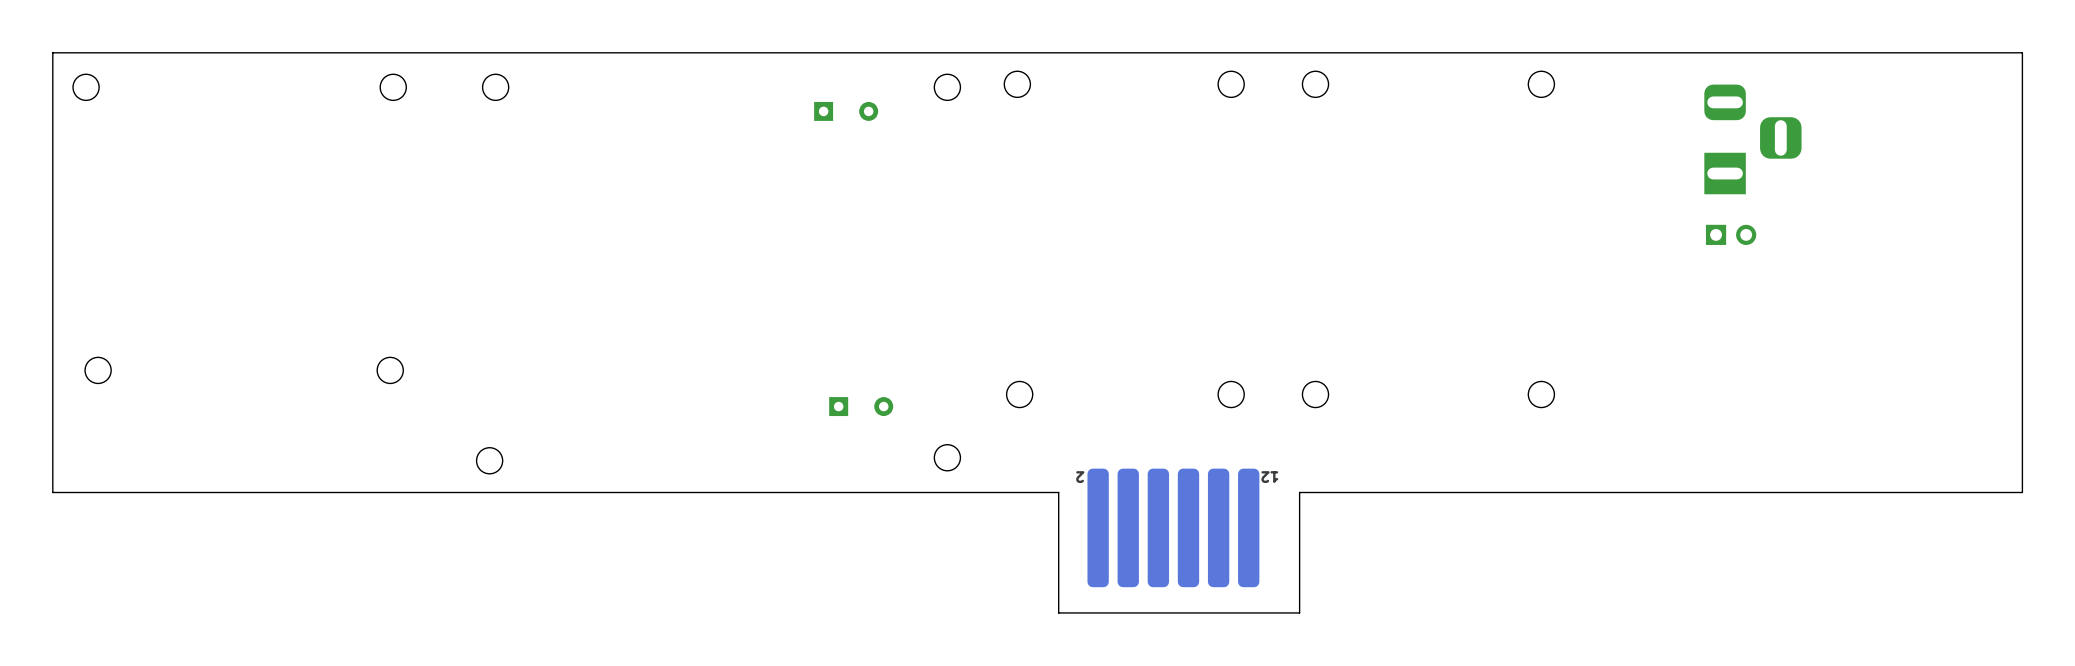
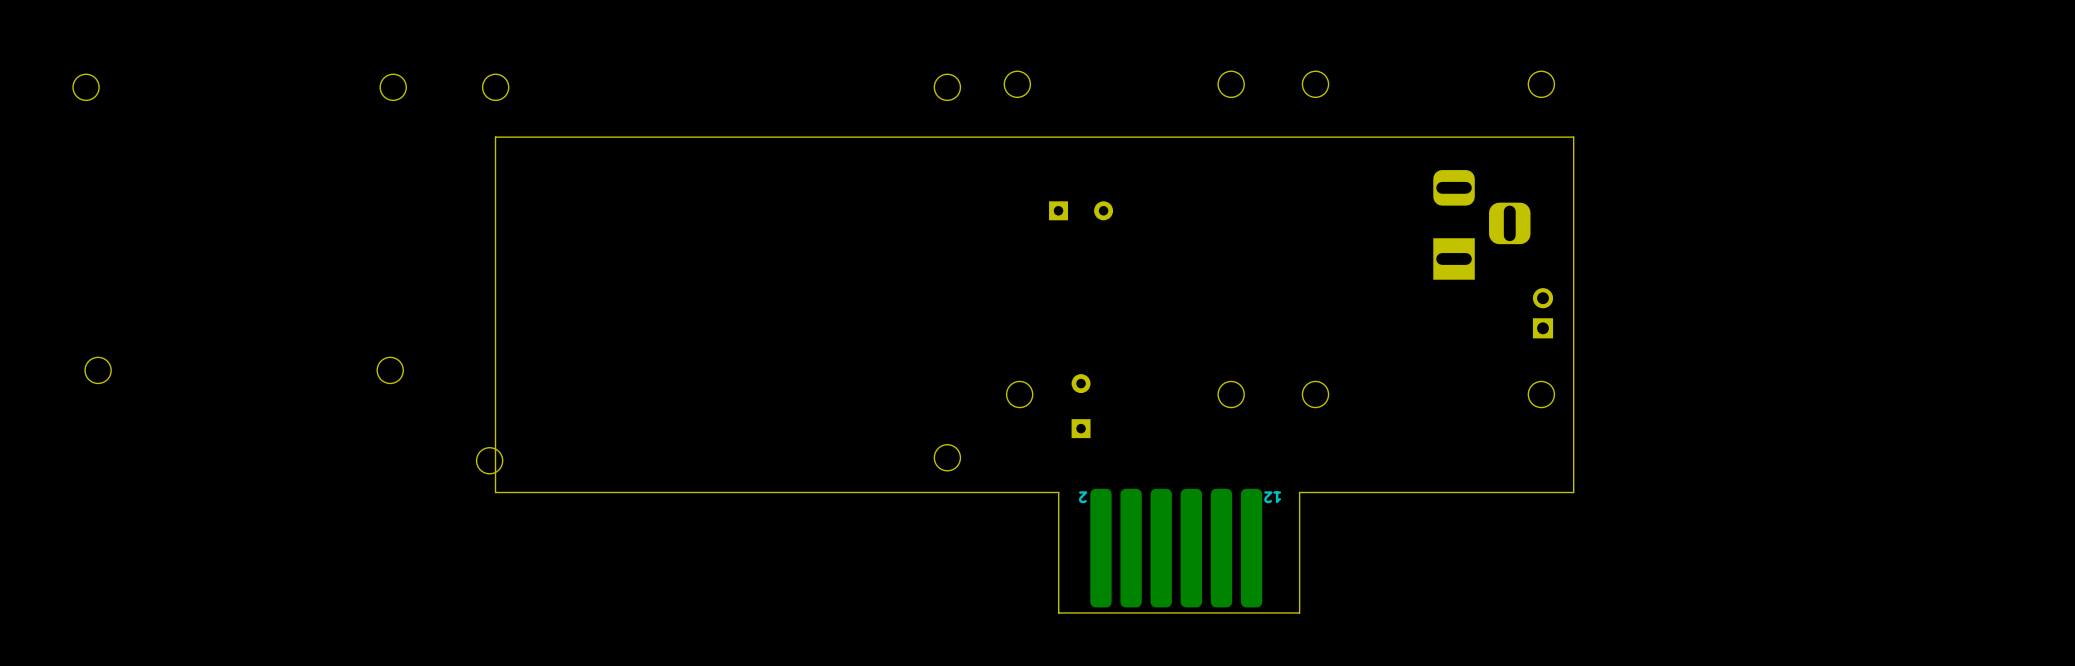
part: (846, 111) -> none
part position: (1752, 139) -> (1481, 224)
part: none -> (1081, 210)
part rotation: 0° (1731, 234) -> 90° counterclockwise (1542, 313)
part position: (1731, 234) -> (1542, 313)
part: (861, 406) -> none
part: none -> (1081, 406)
board edge: (1573, 492) (2022, 492) (2022, 52) (52, 52) (52, 492) (495, 492) -> (1573, 492) (1573, 137) (495, 137) (495, 492)
part position: (1173, 527) -> (1176, 548)

